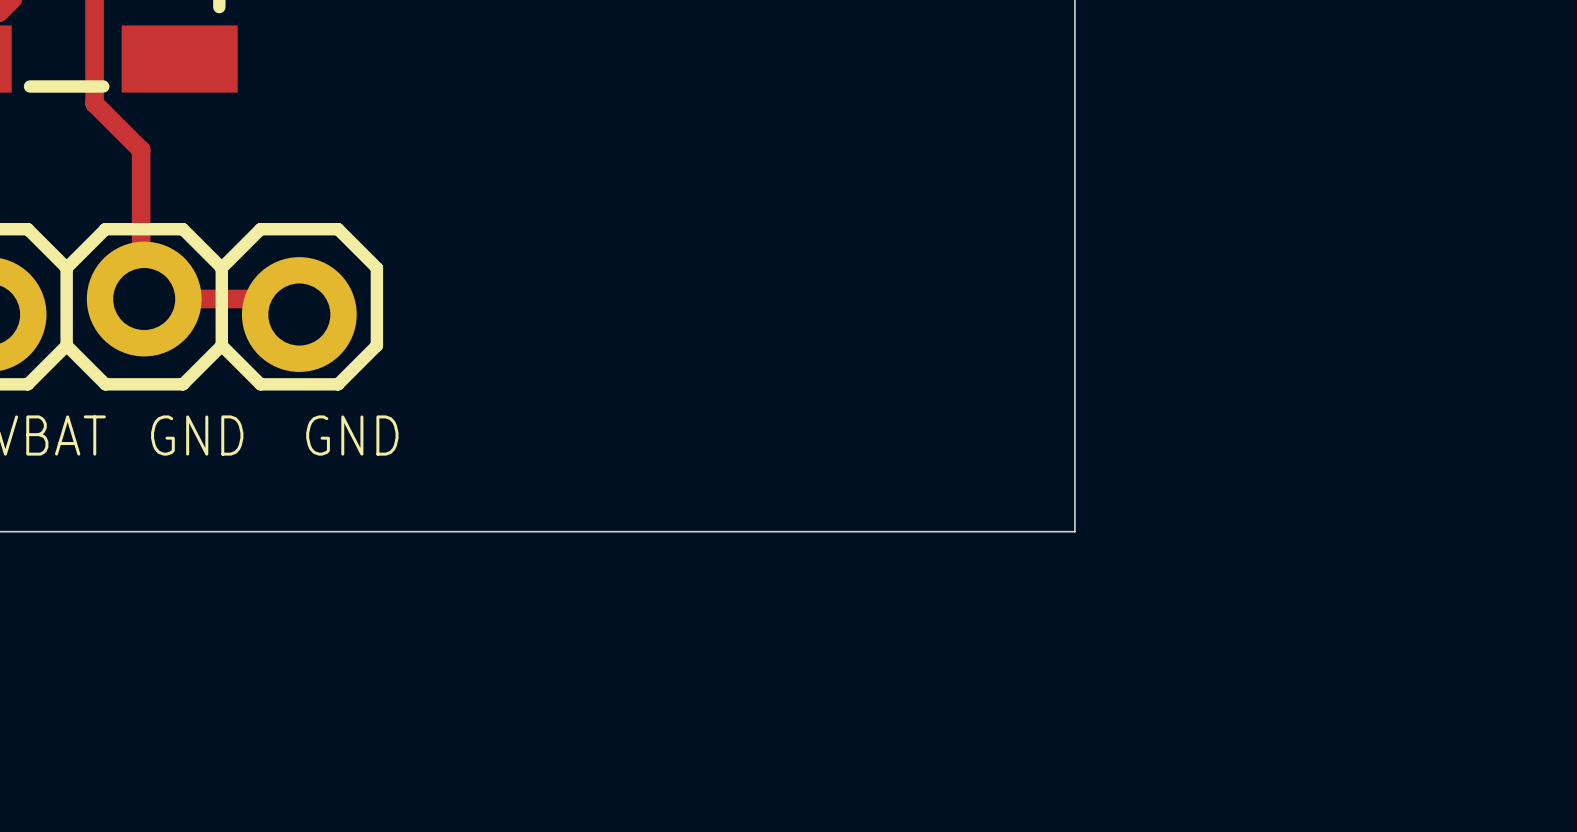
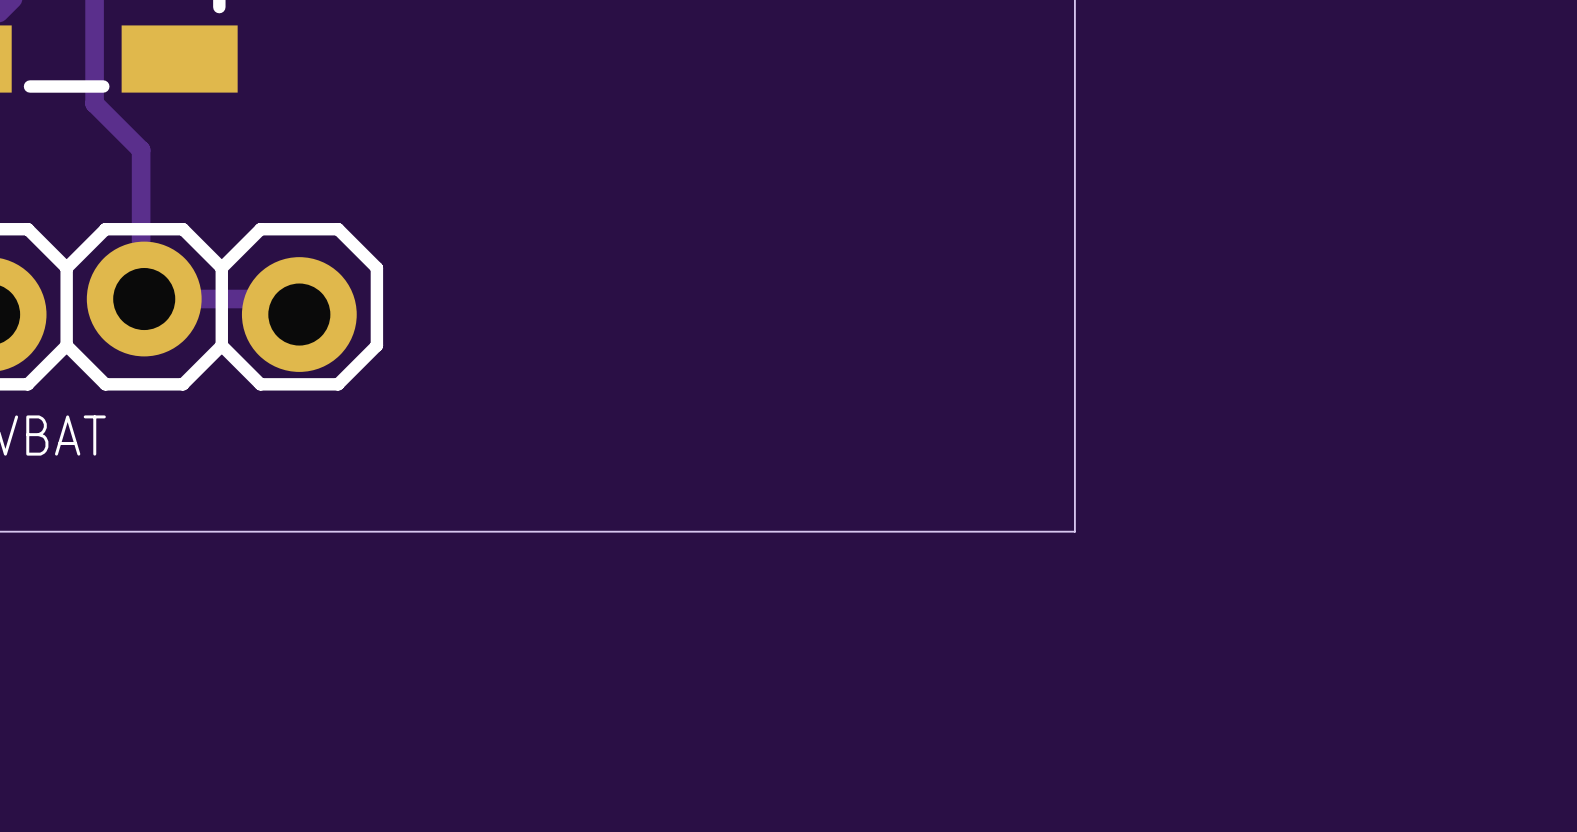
text: GND (197, 435) -> none
text: GND (352, 435) -> none

